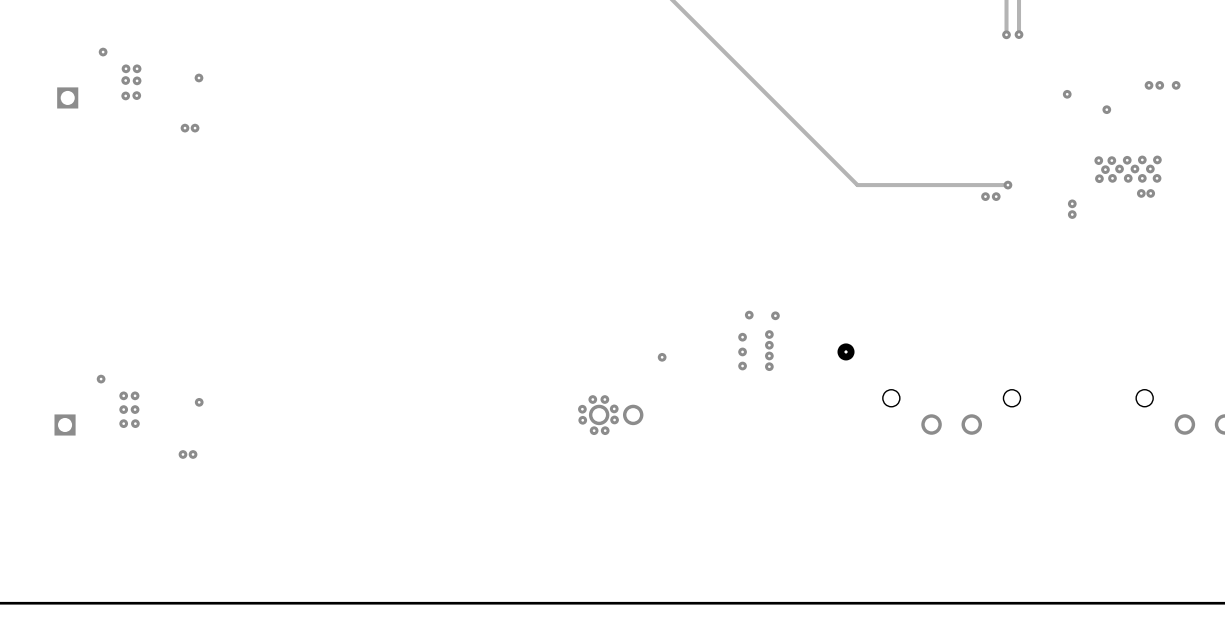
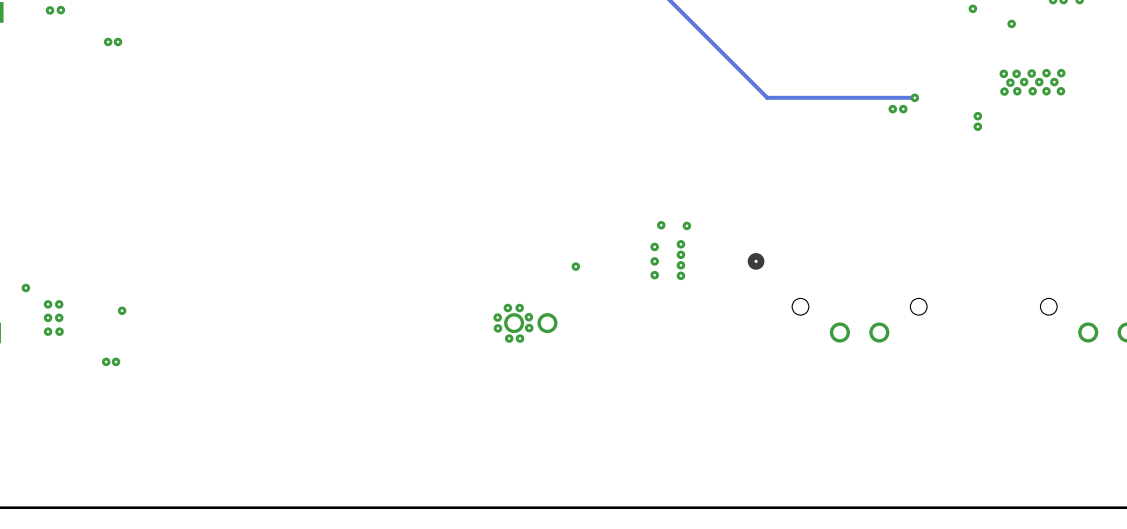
via: (1141, 193) -> none
via: (1150, 193) -> none

